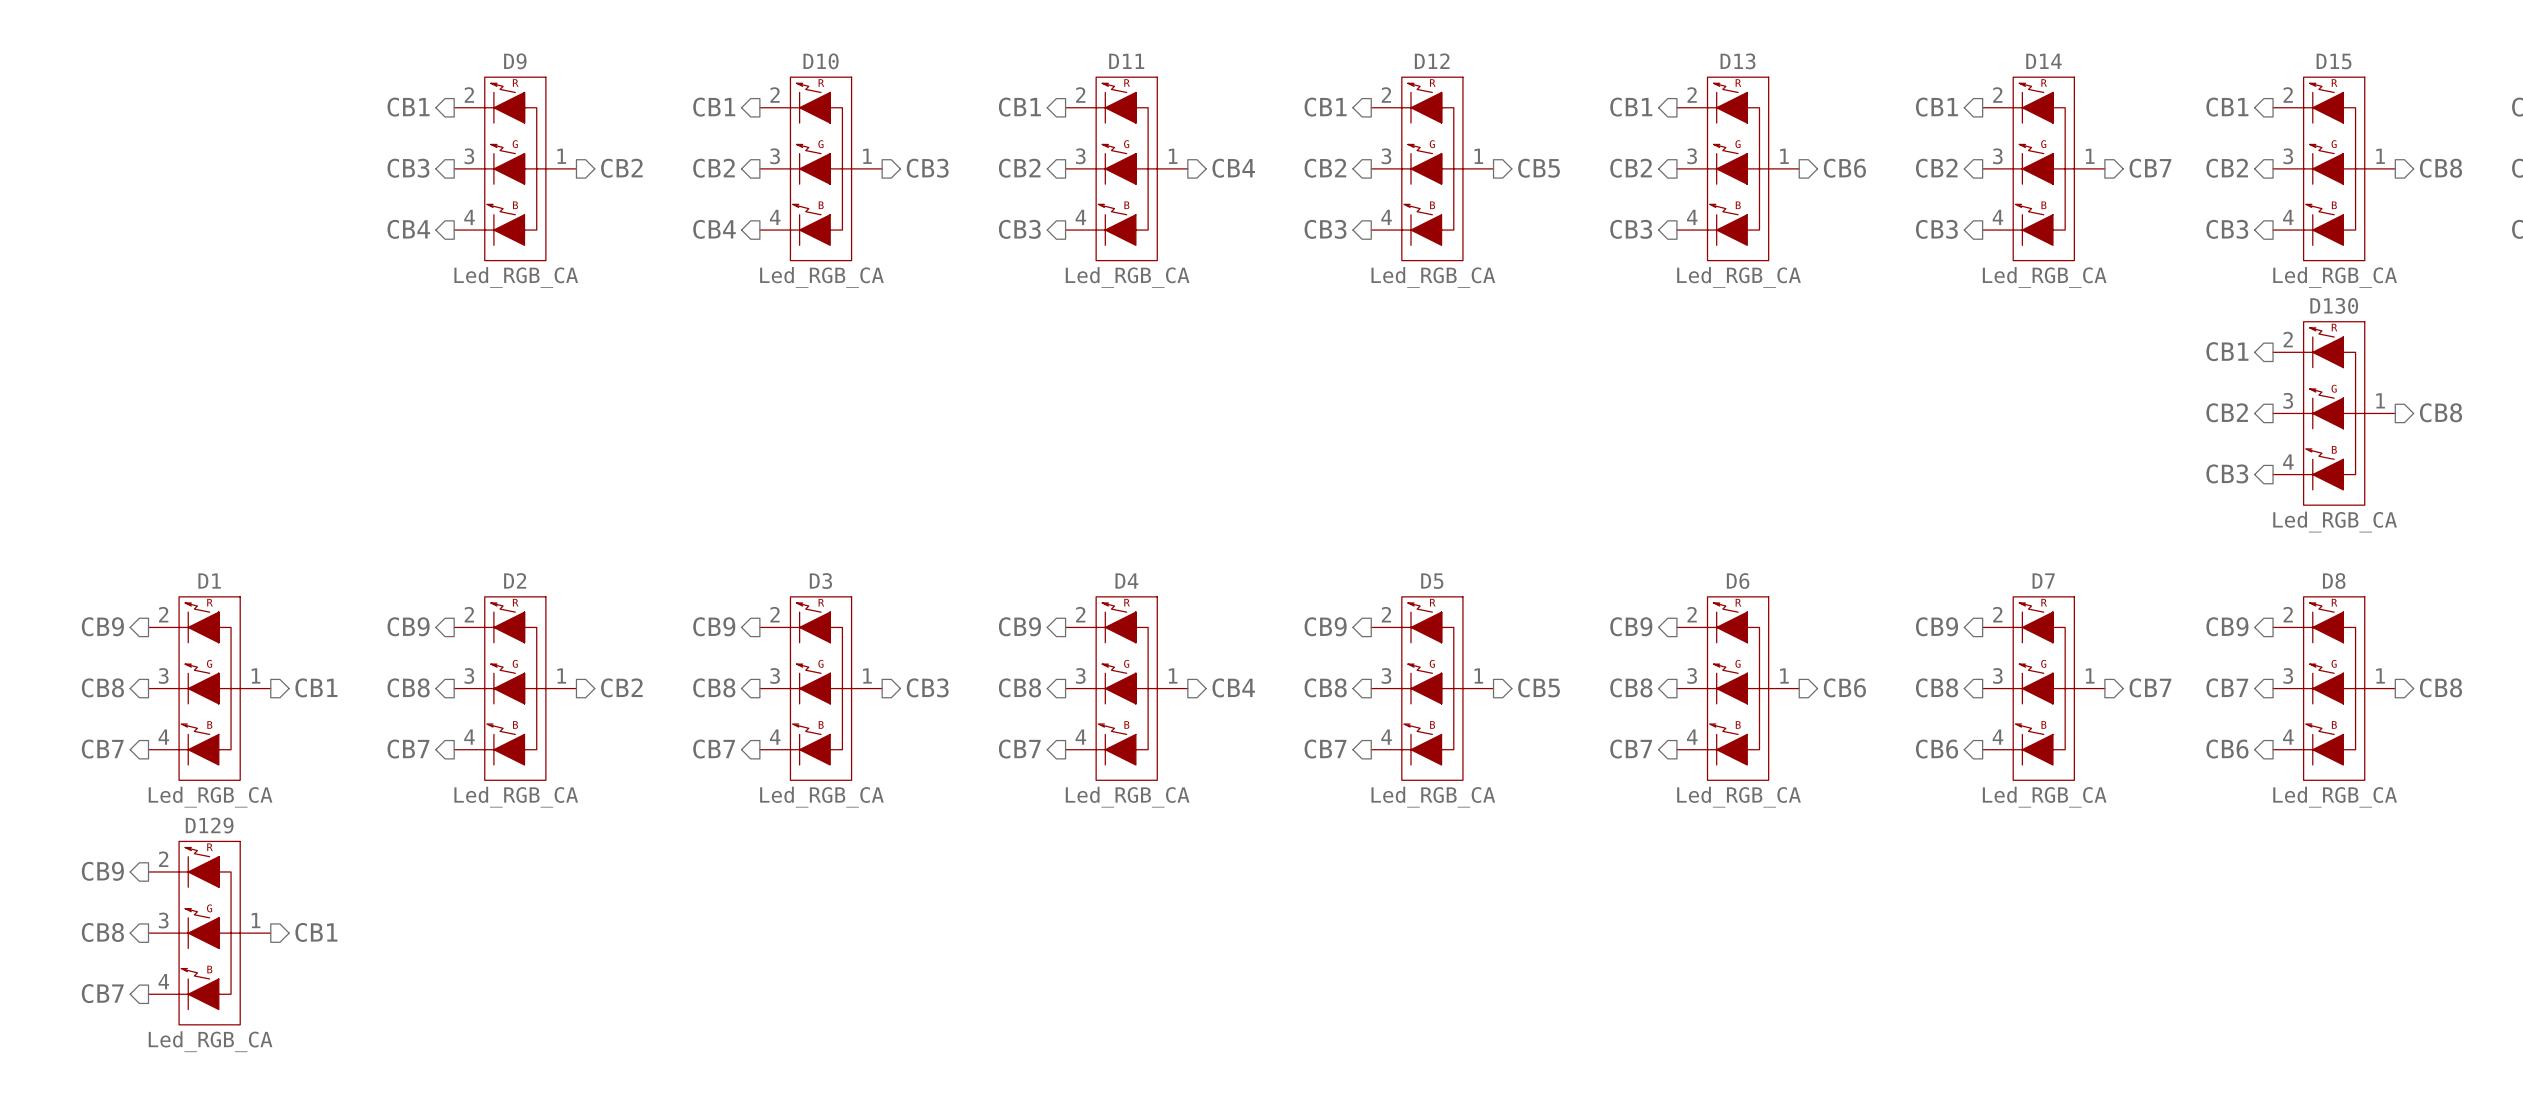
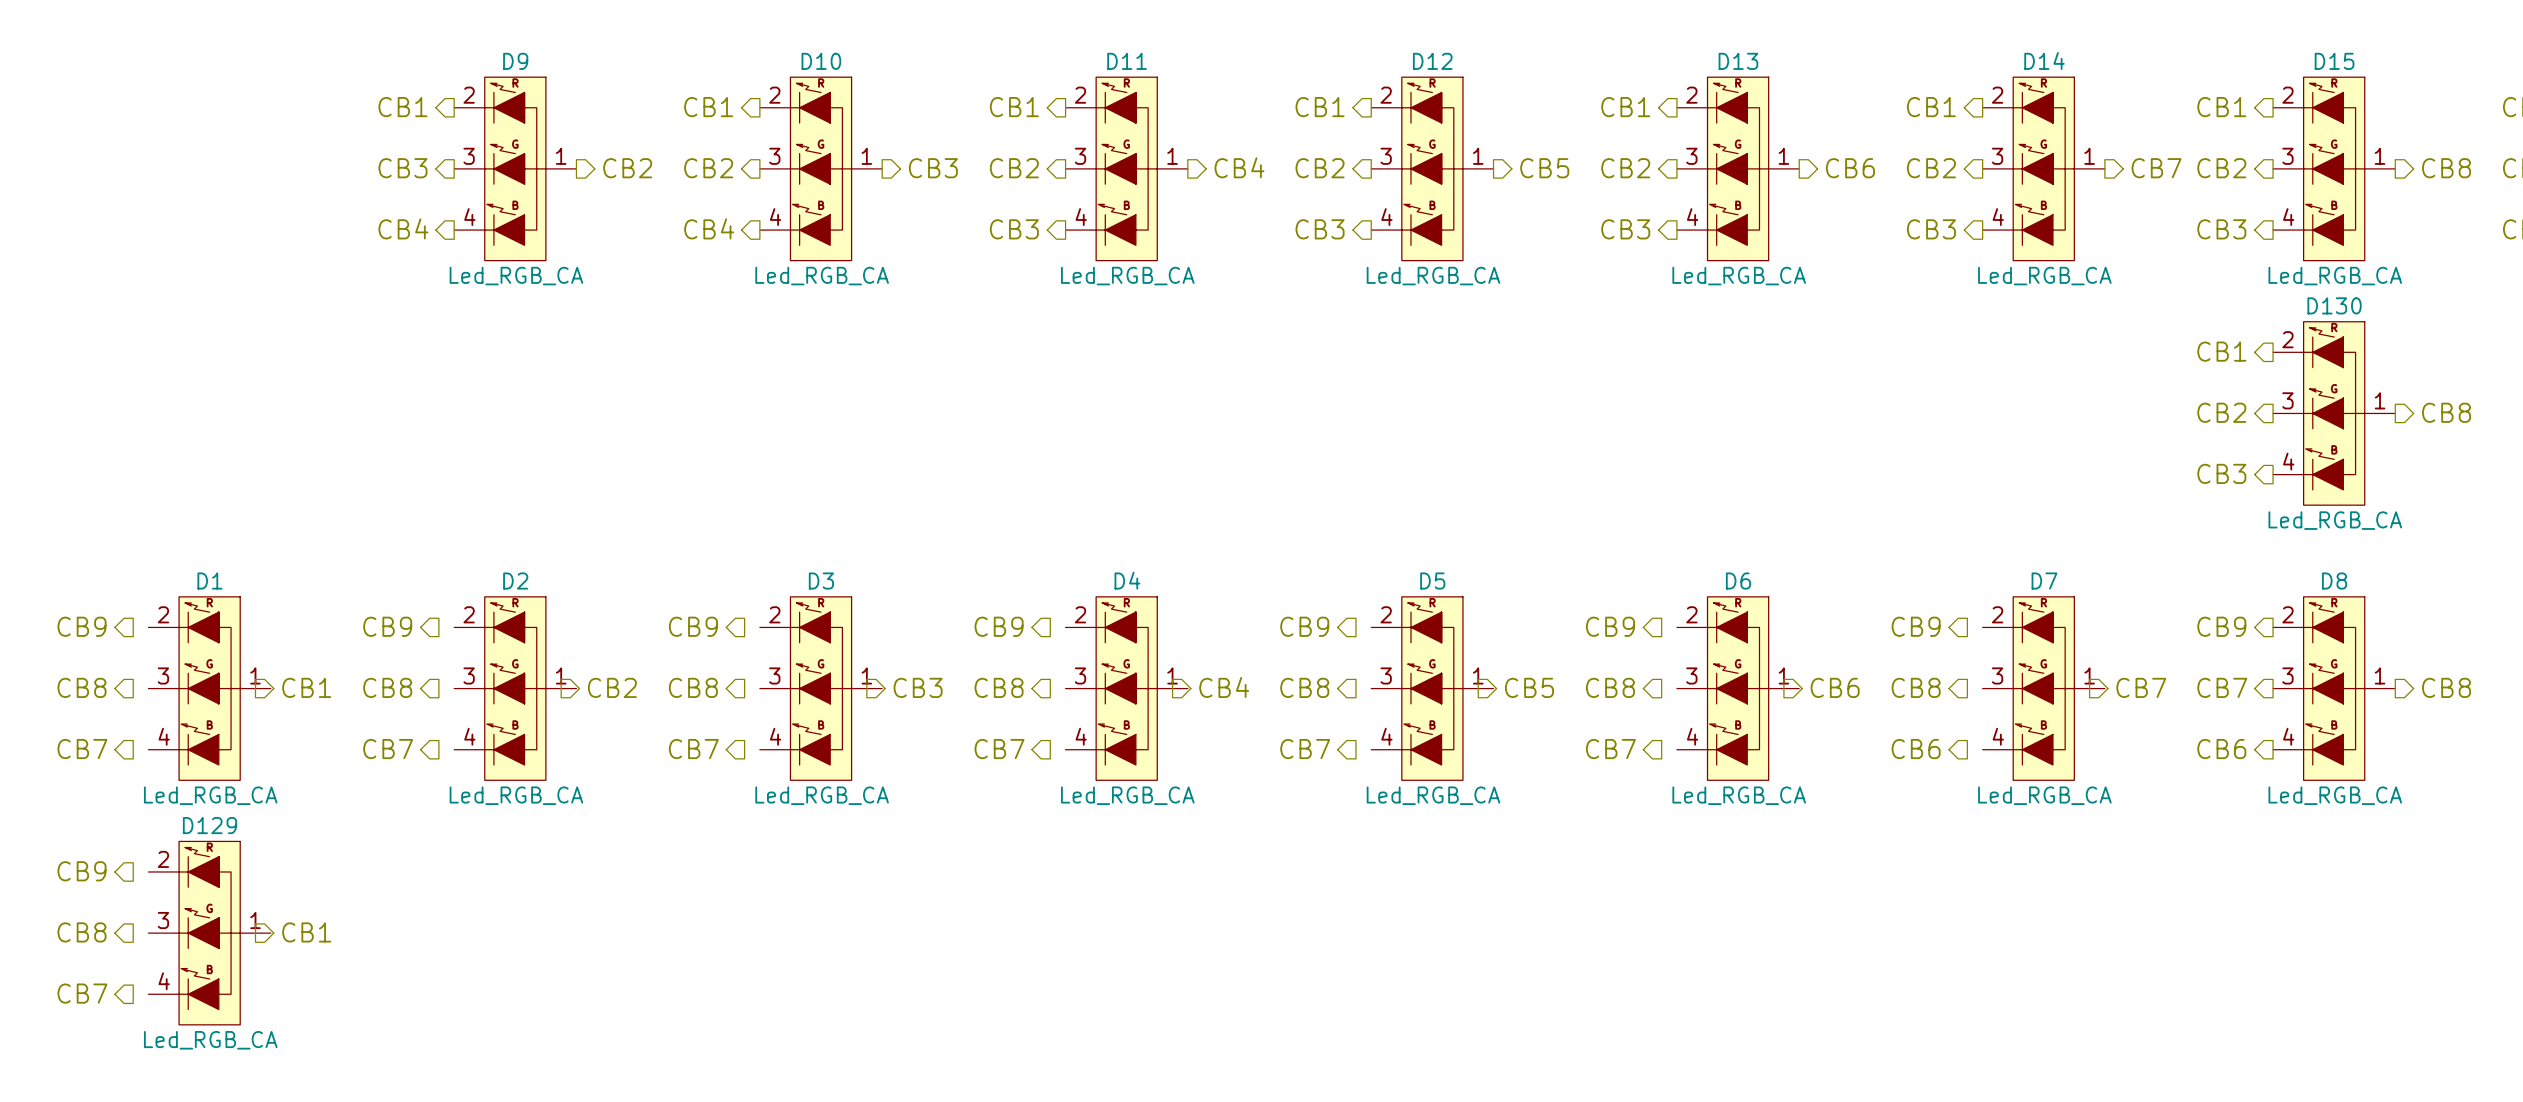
hierarchical label position: CB9 (102, 626) -> CB9 (82, 626)
hierarchical label position: CB9 (408, 626) -> CB9 (387, 626)
hierarchical label position: CB9 (714, 626) -> CB9 (693, 626)
hierarchical label position: CB9 (1019, 626) -> CB9 (999, 626)
hierarchical label position: CB9 (1325, 626) -> CB9 (1304, 626)
hierarchical label position: CB9 (1631, 626) -> CB9 (1610, 626)
hierarchical label position: CB9 (1936, 626) -> CB9 (1916, 626)
hierarchical label position: CB8 (102, 687) -> CB8 (82, 687)
hierarchical label position: CB1 (316, 687) -> CB1 (306, 687)
hierarchical label position: CB8 (408, 687) -> CB8 (387, 687)
hierarchical label position: CB2 (621, 687) -> CB2 (612, 687)
hierarchical label position: CB8 (714, 687) -> CB8 (693, 687)
hierarchical label position: CB3 (927, 687) -> CB3 (918, 687)
hierarchical label position: CB8 (1019, 687) -> CB8 (999, 687)
hierarchical label position: CB4 (1233, 687) -> CB4 (1224, 687)
hierarchical label position: CB8 (1325, 687) -> CB8 (1304, 687)
hierarchical label position: CB5 (1539, 687) -> CB5 (1529, 687)
hierarchical label position: CB8 (1631, 687) -> CB8 (1610, 687)
hierarchical label position: CB6 (1844, 687) -> CB6 (1835, 687)
hierarchical label position: CB8 (1937, 687) -> CB8 (1916, 687)
hierarchical label position: CB7 (2150, 687) -> CB7 (2141, 687)
hierarchical label position: CB7 (102, 749) -> CB7 (82, 749)
hierarchical label position: CB7 (408, 749) -> CB7 (388, 749)
hierarchical label position: CB7 (714, 749) -> CB7 (693, 749)
hierarchical label position: CB7 (1019, 749) -> CB7 (999, 749)
hierarchical label position: CB7 (1325, 749) -> CB7 (1305, 749)
hierarchical label position: CB7 (1631, 749) -> CB7 (1610, 749)
hierarchical label position: CB6 (1937, 749) -> CB6 (1916, 749)
hierarchical label position: CB9 (102, 871) -> CB9 (82, 871)
hierarchical label position: CB8 (102, 932) -> CB8 (82, 932)
hierarchical label position: CB1 (316, 932) -> CB1 (306, 932)
hierarchical label position: CB7 (102, 993) -> CB7 (82, 993)

